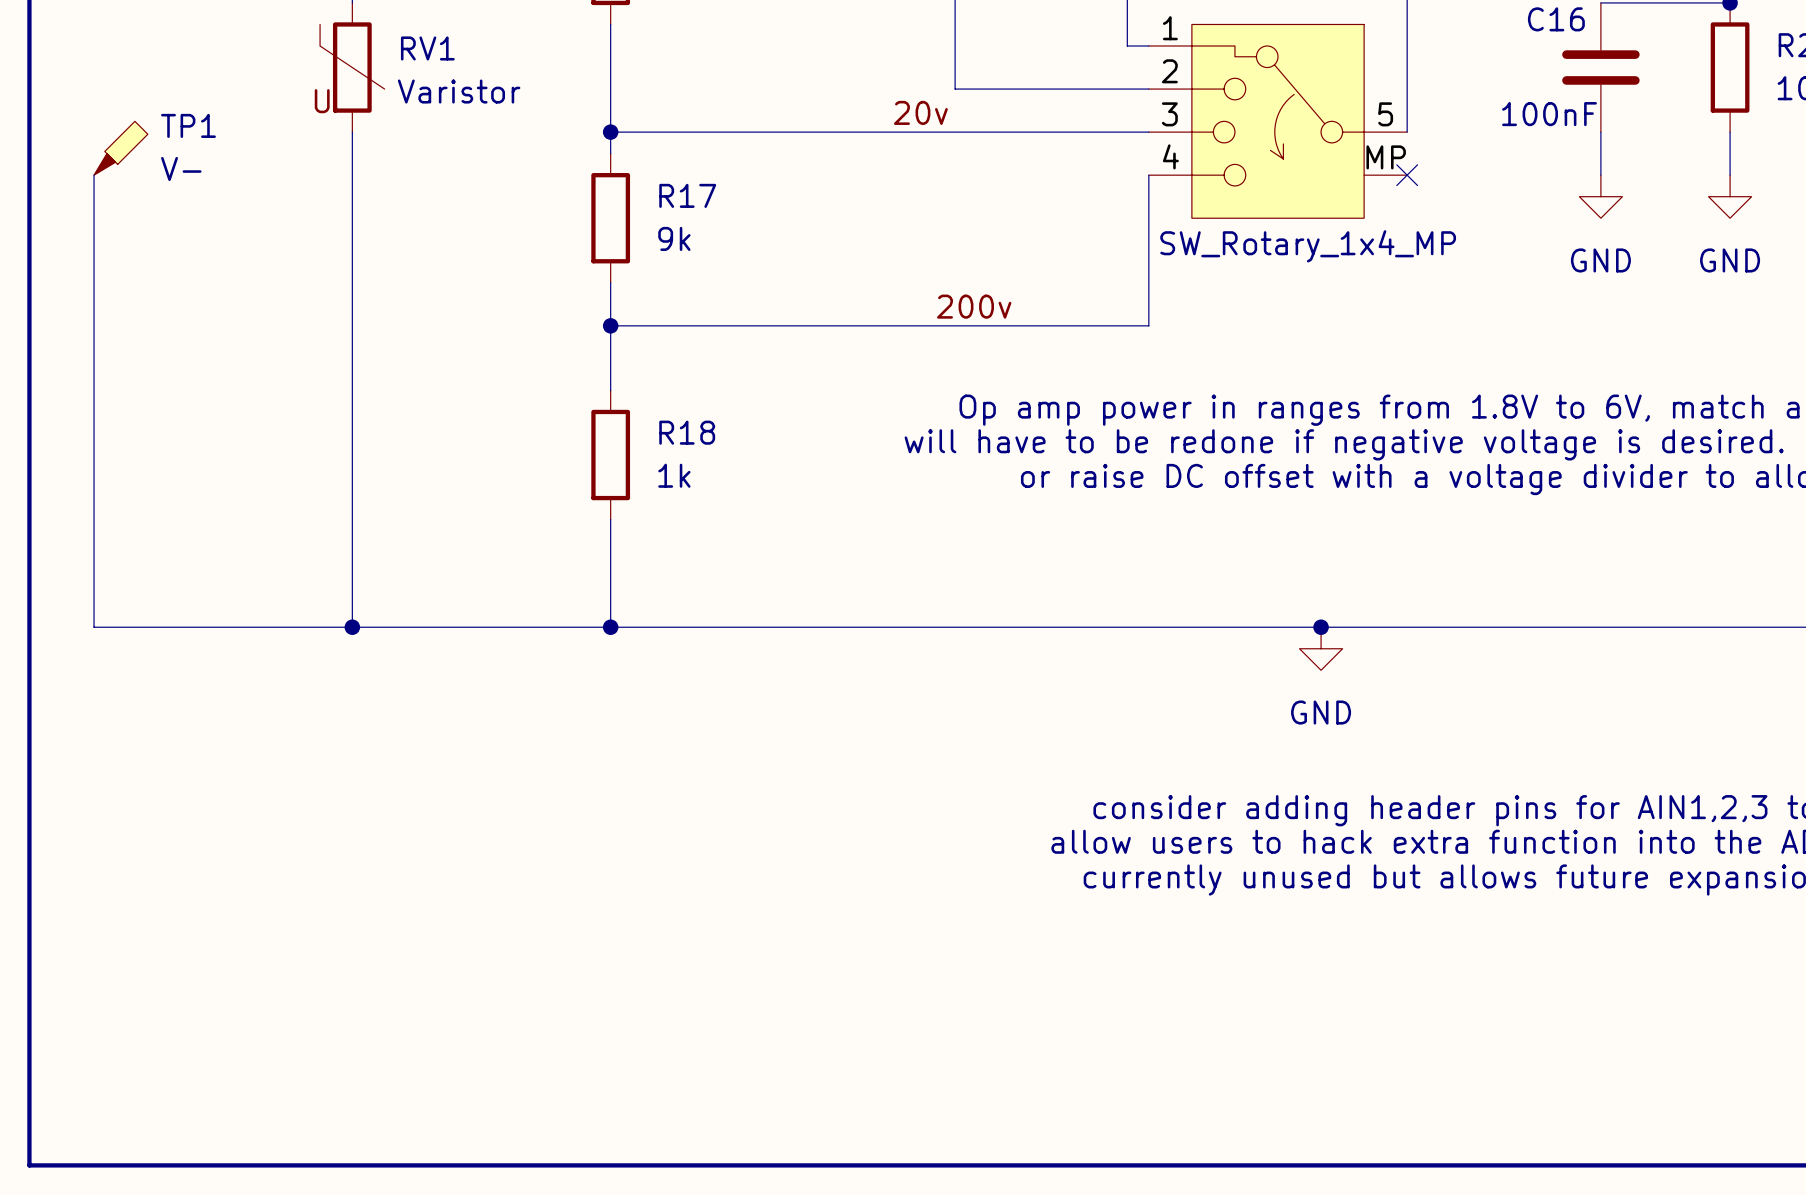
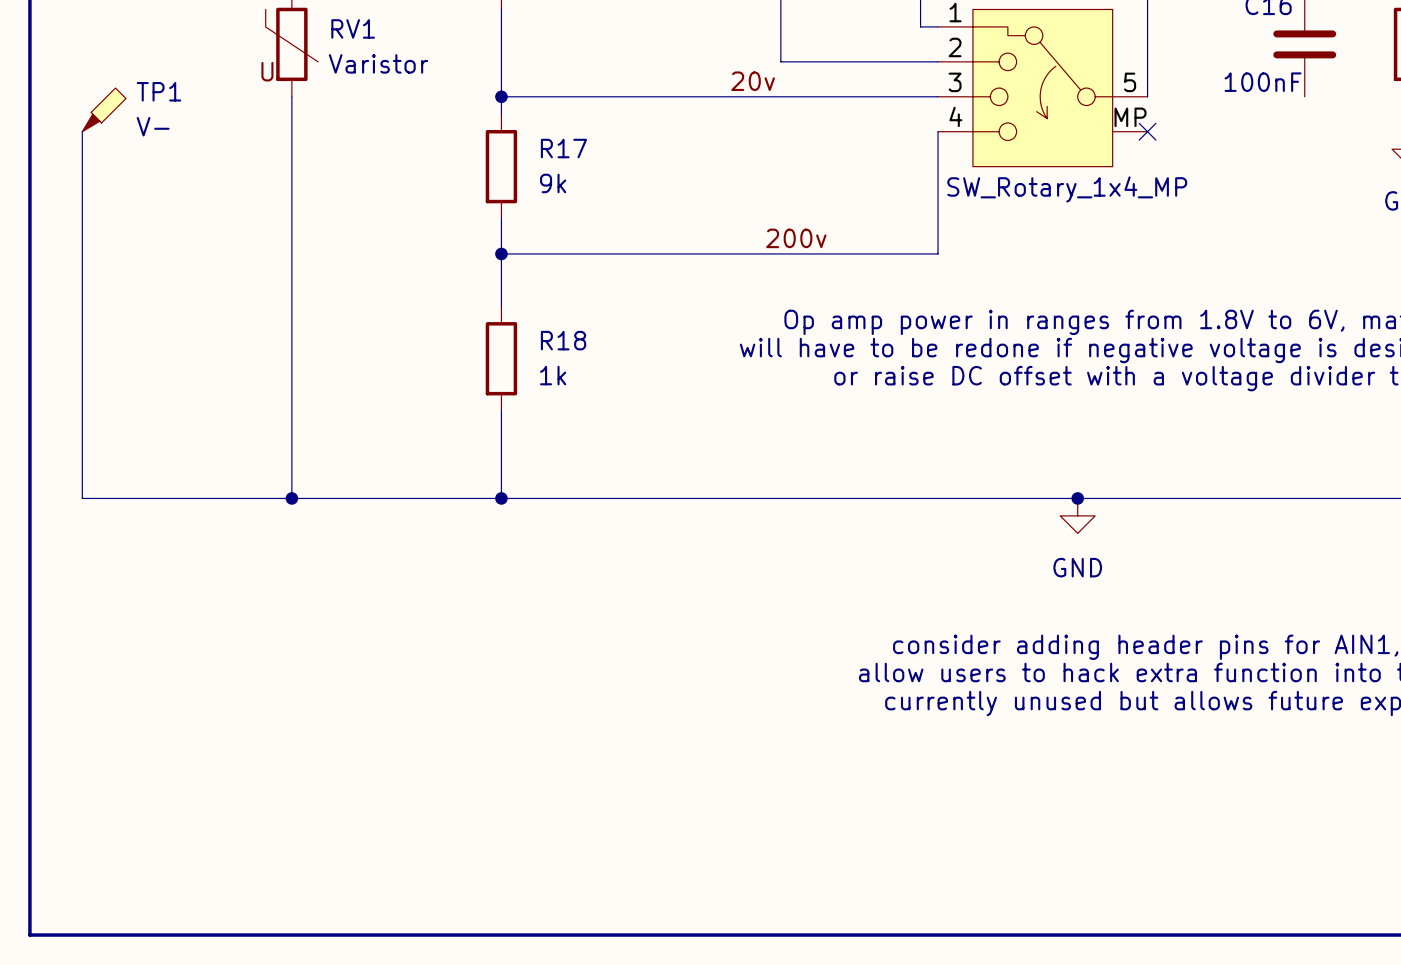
wire: (1600, 132) (1600, 175) -> none
power symbol: GND (1600, 196) -> none

